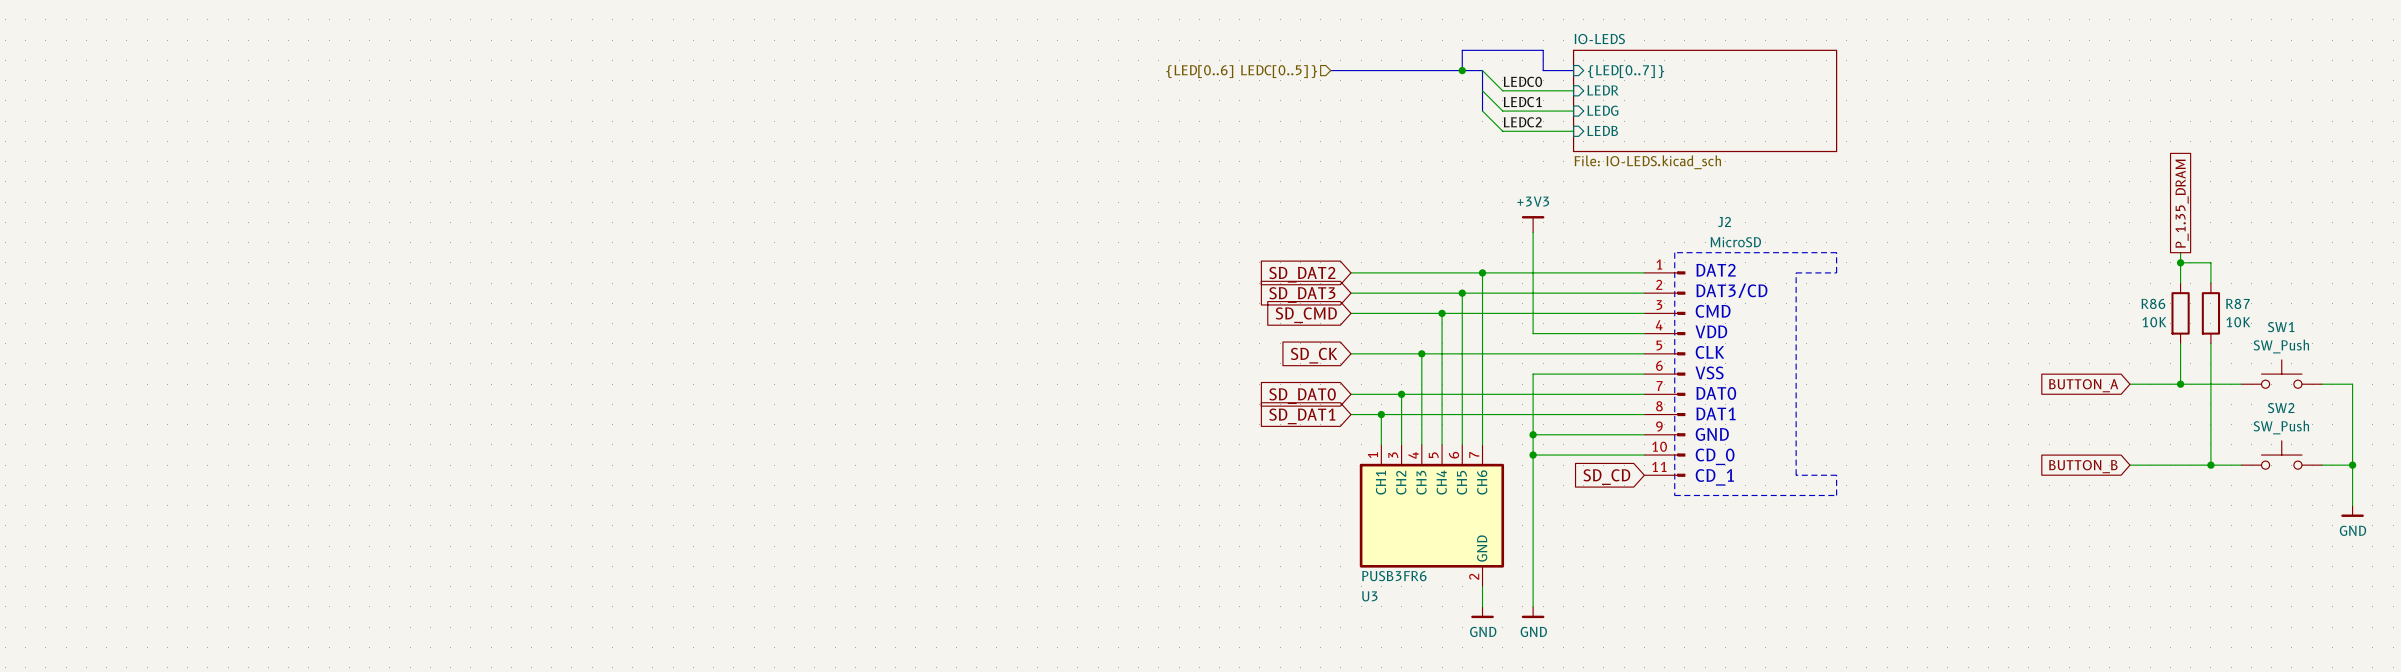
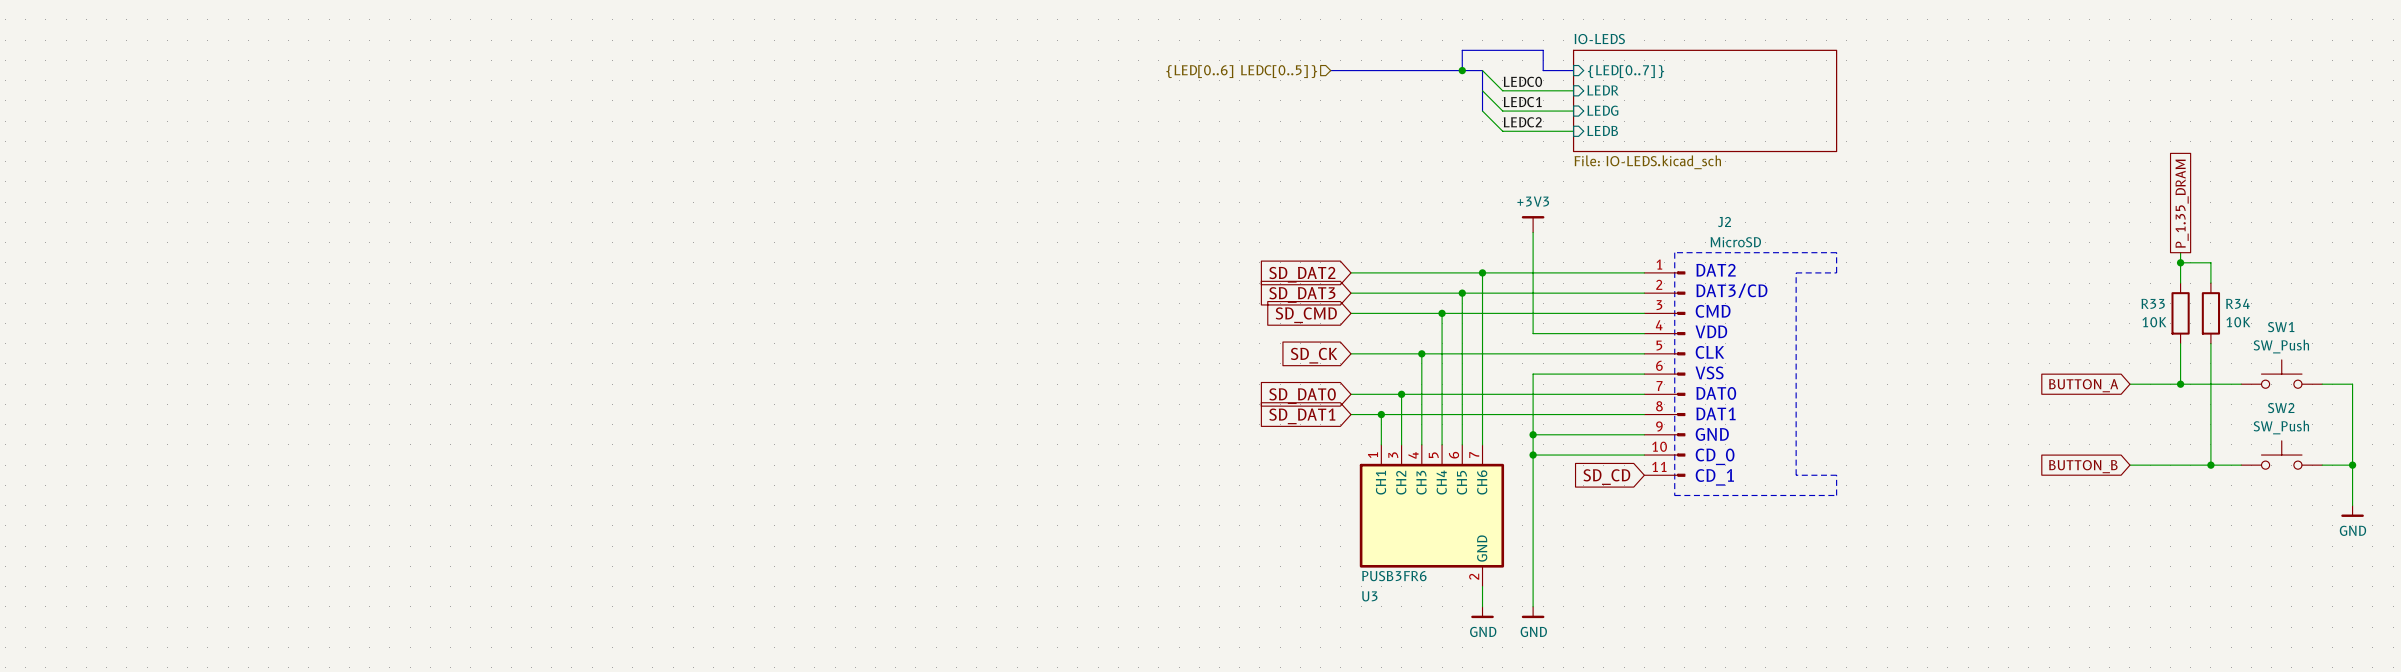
R86 name: R86 (2153, 303) -> R33 (2153, 303)
R87 name: R87 (2237, 303) -> R34 (2237, 303)

